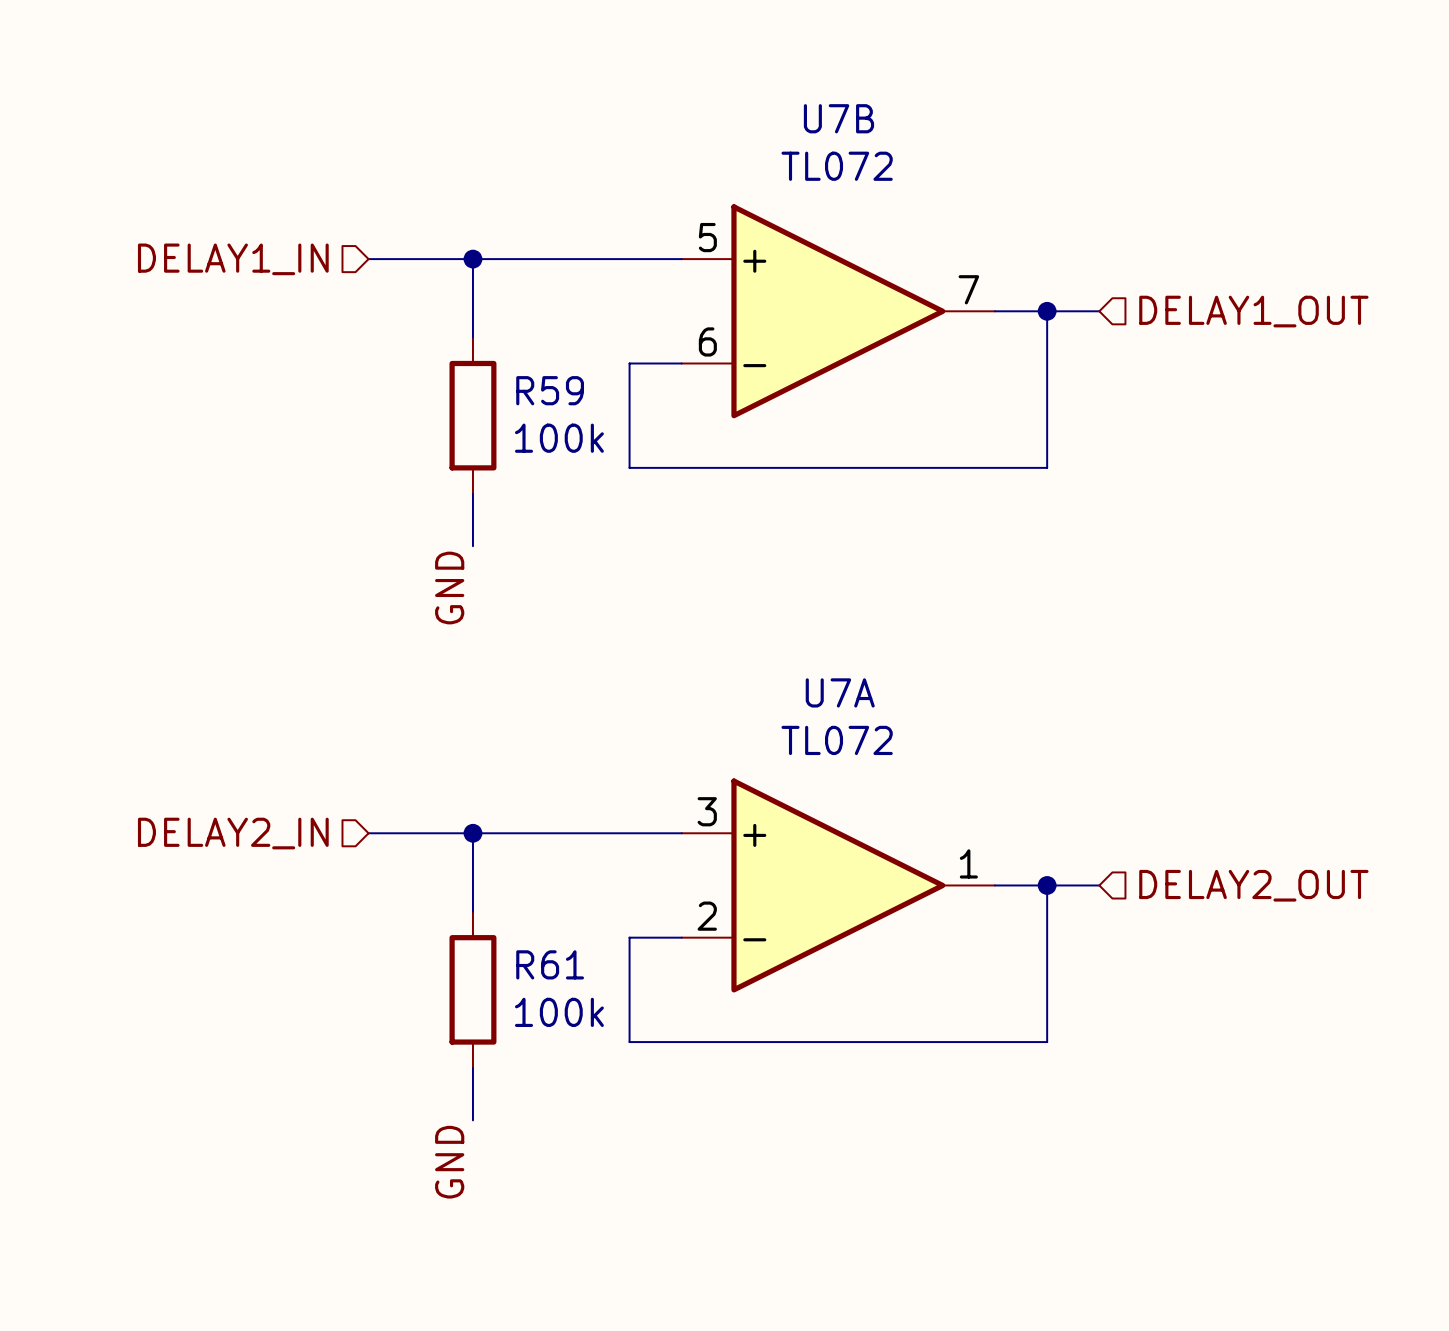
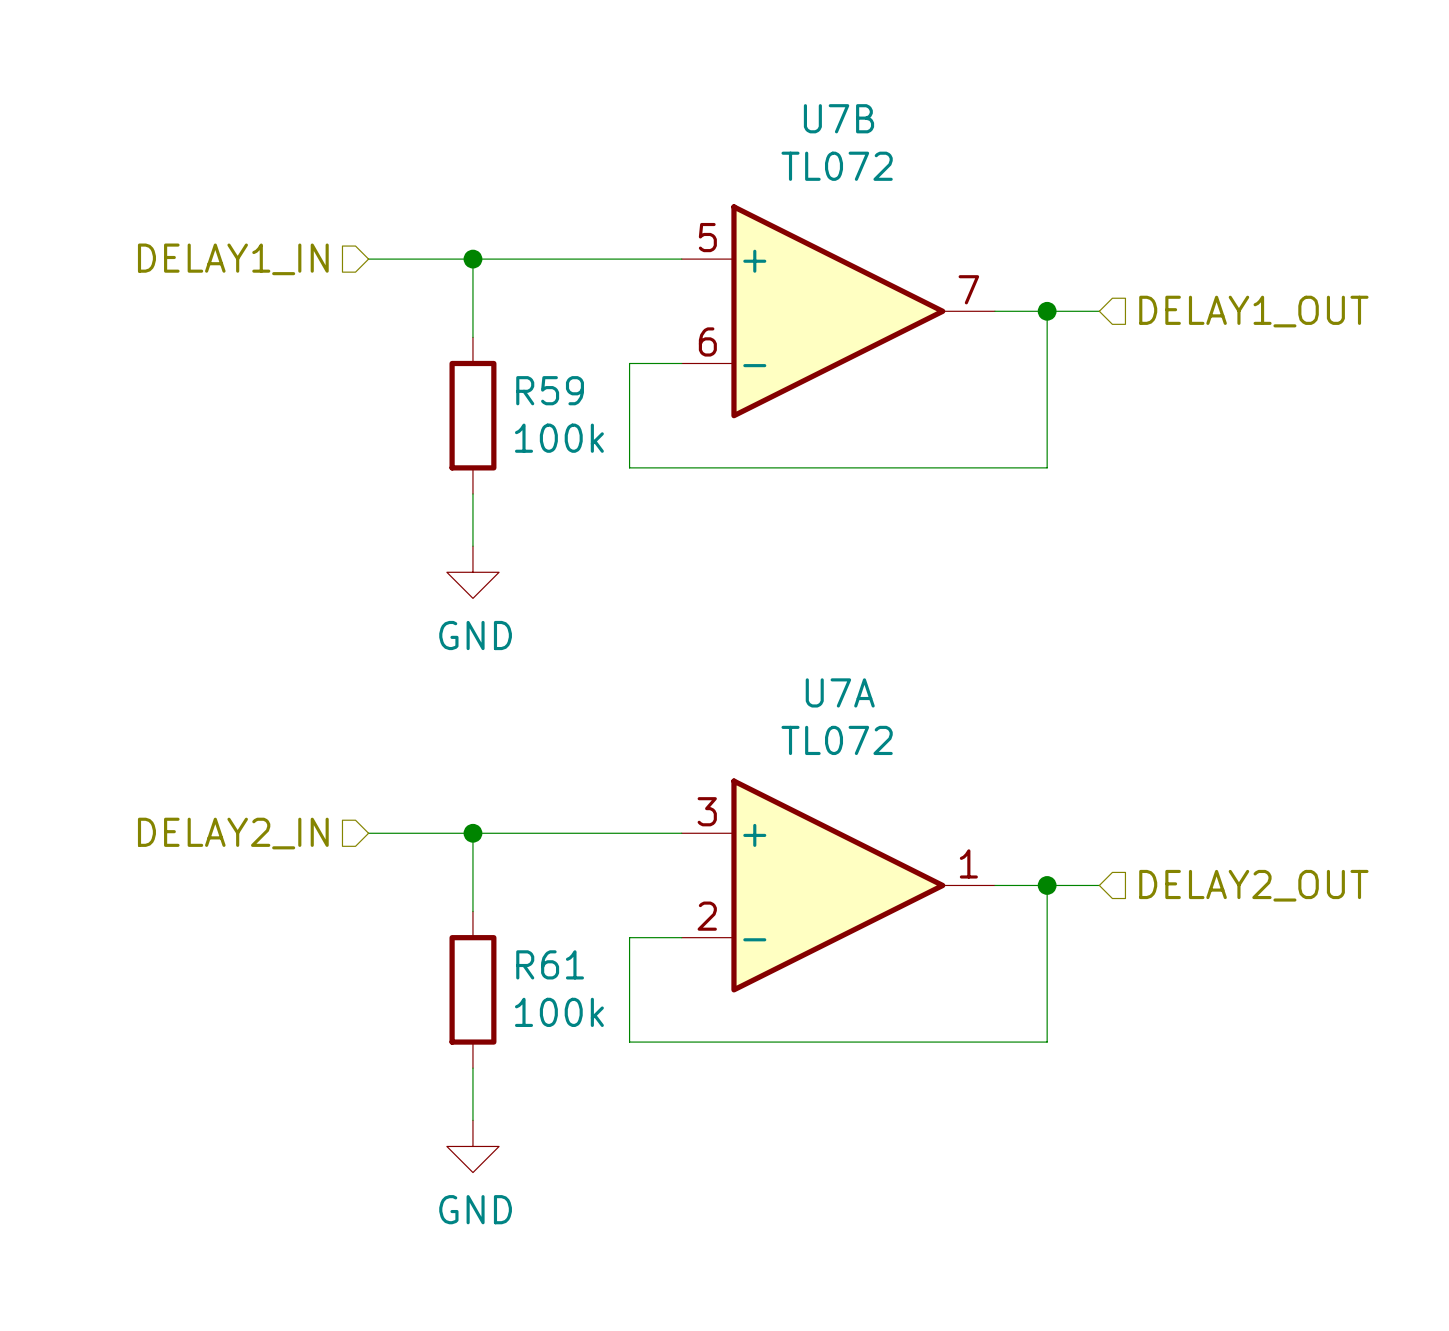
power symbol: none -> GND (472, 572)
label: GND (449, 588) -> none
power symbol: none -> GND (472, 1146)
label: GND (449, 1162) -> none

